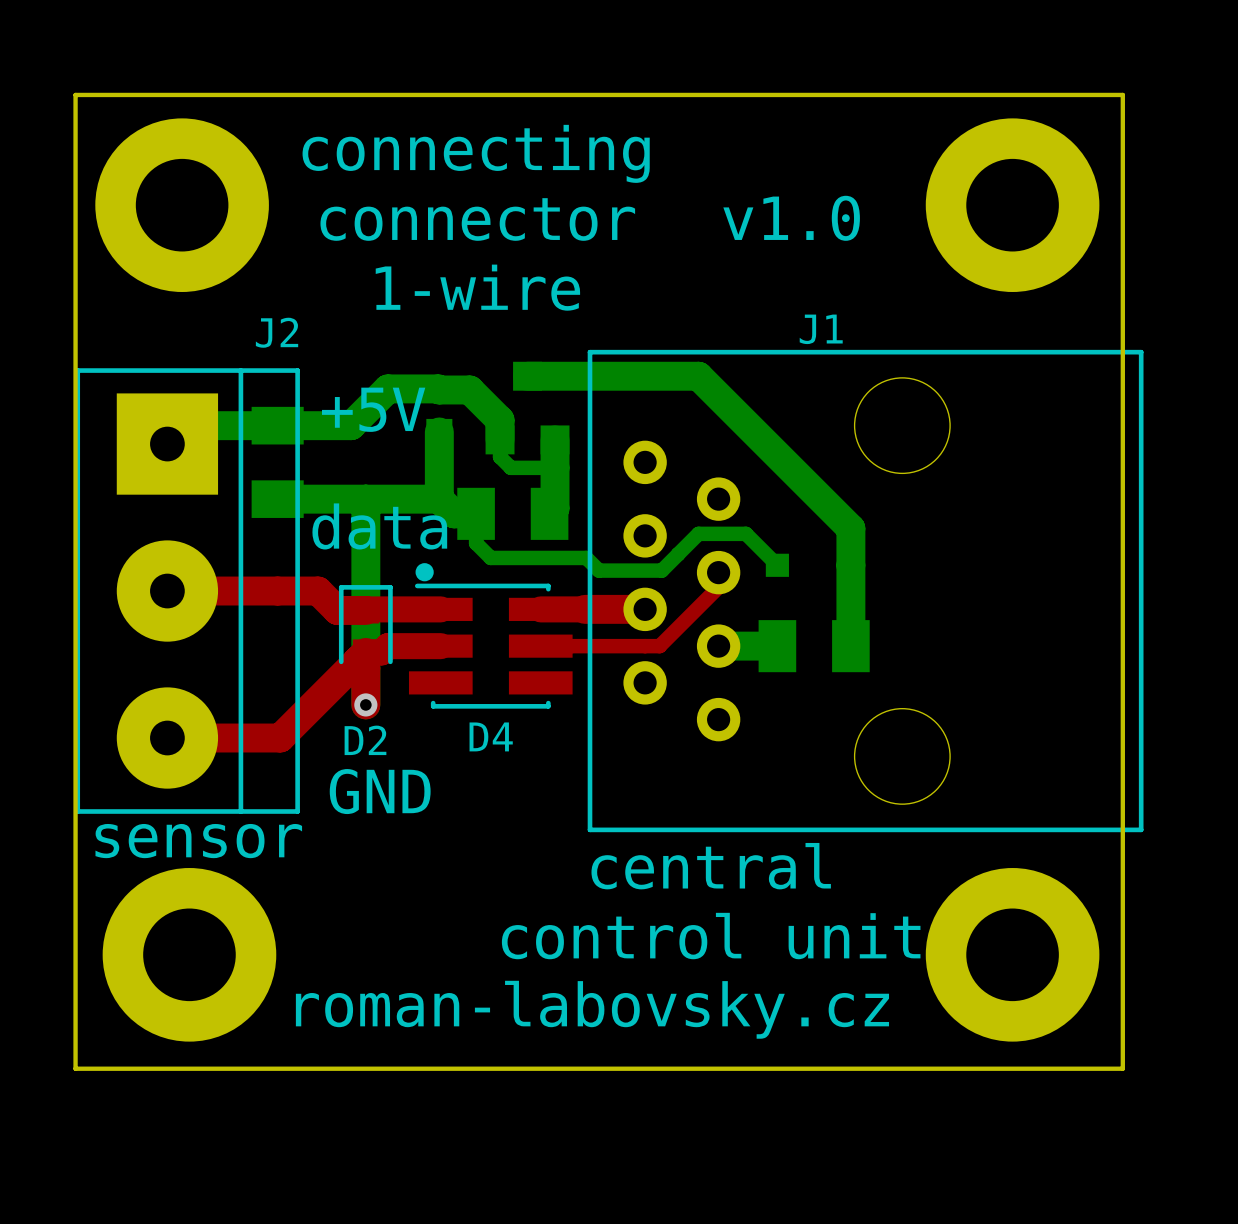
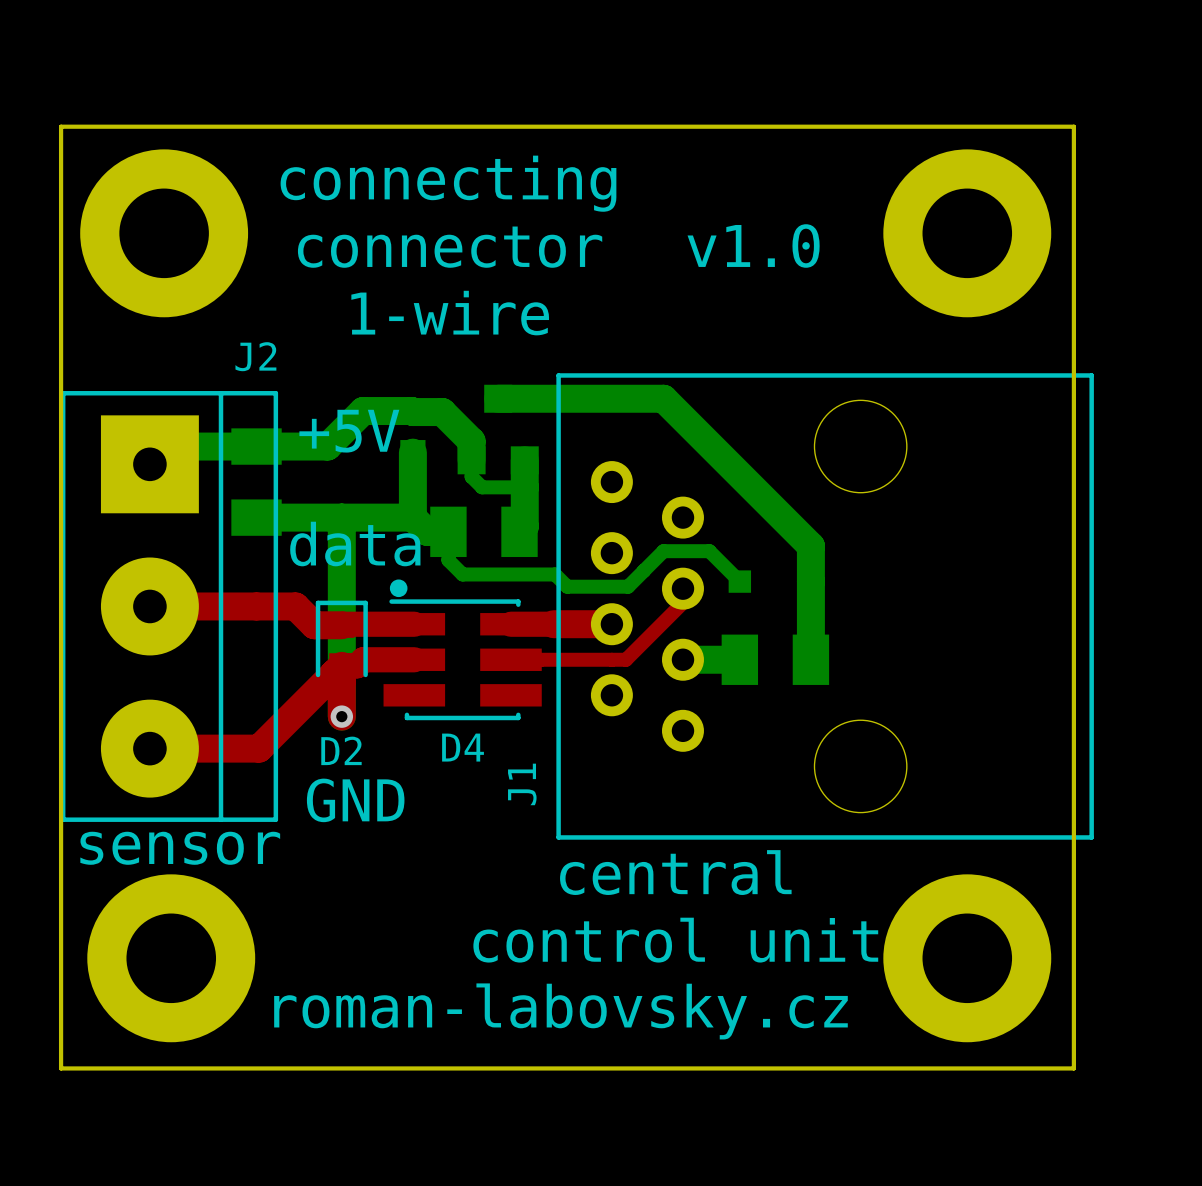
J1 name rotation: 0° (821, 329) -> 90° counterclockwise (522, 784)
J1 name position: J1 (821, 329) -> J1 (522, 784)

